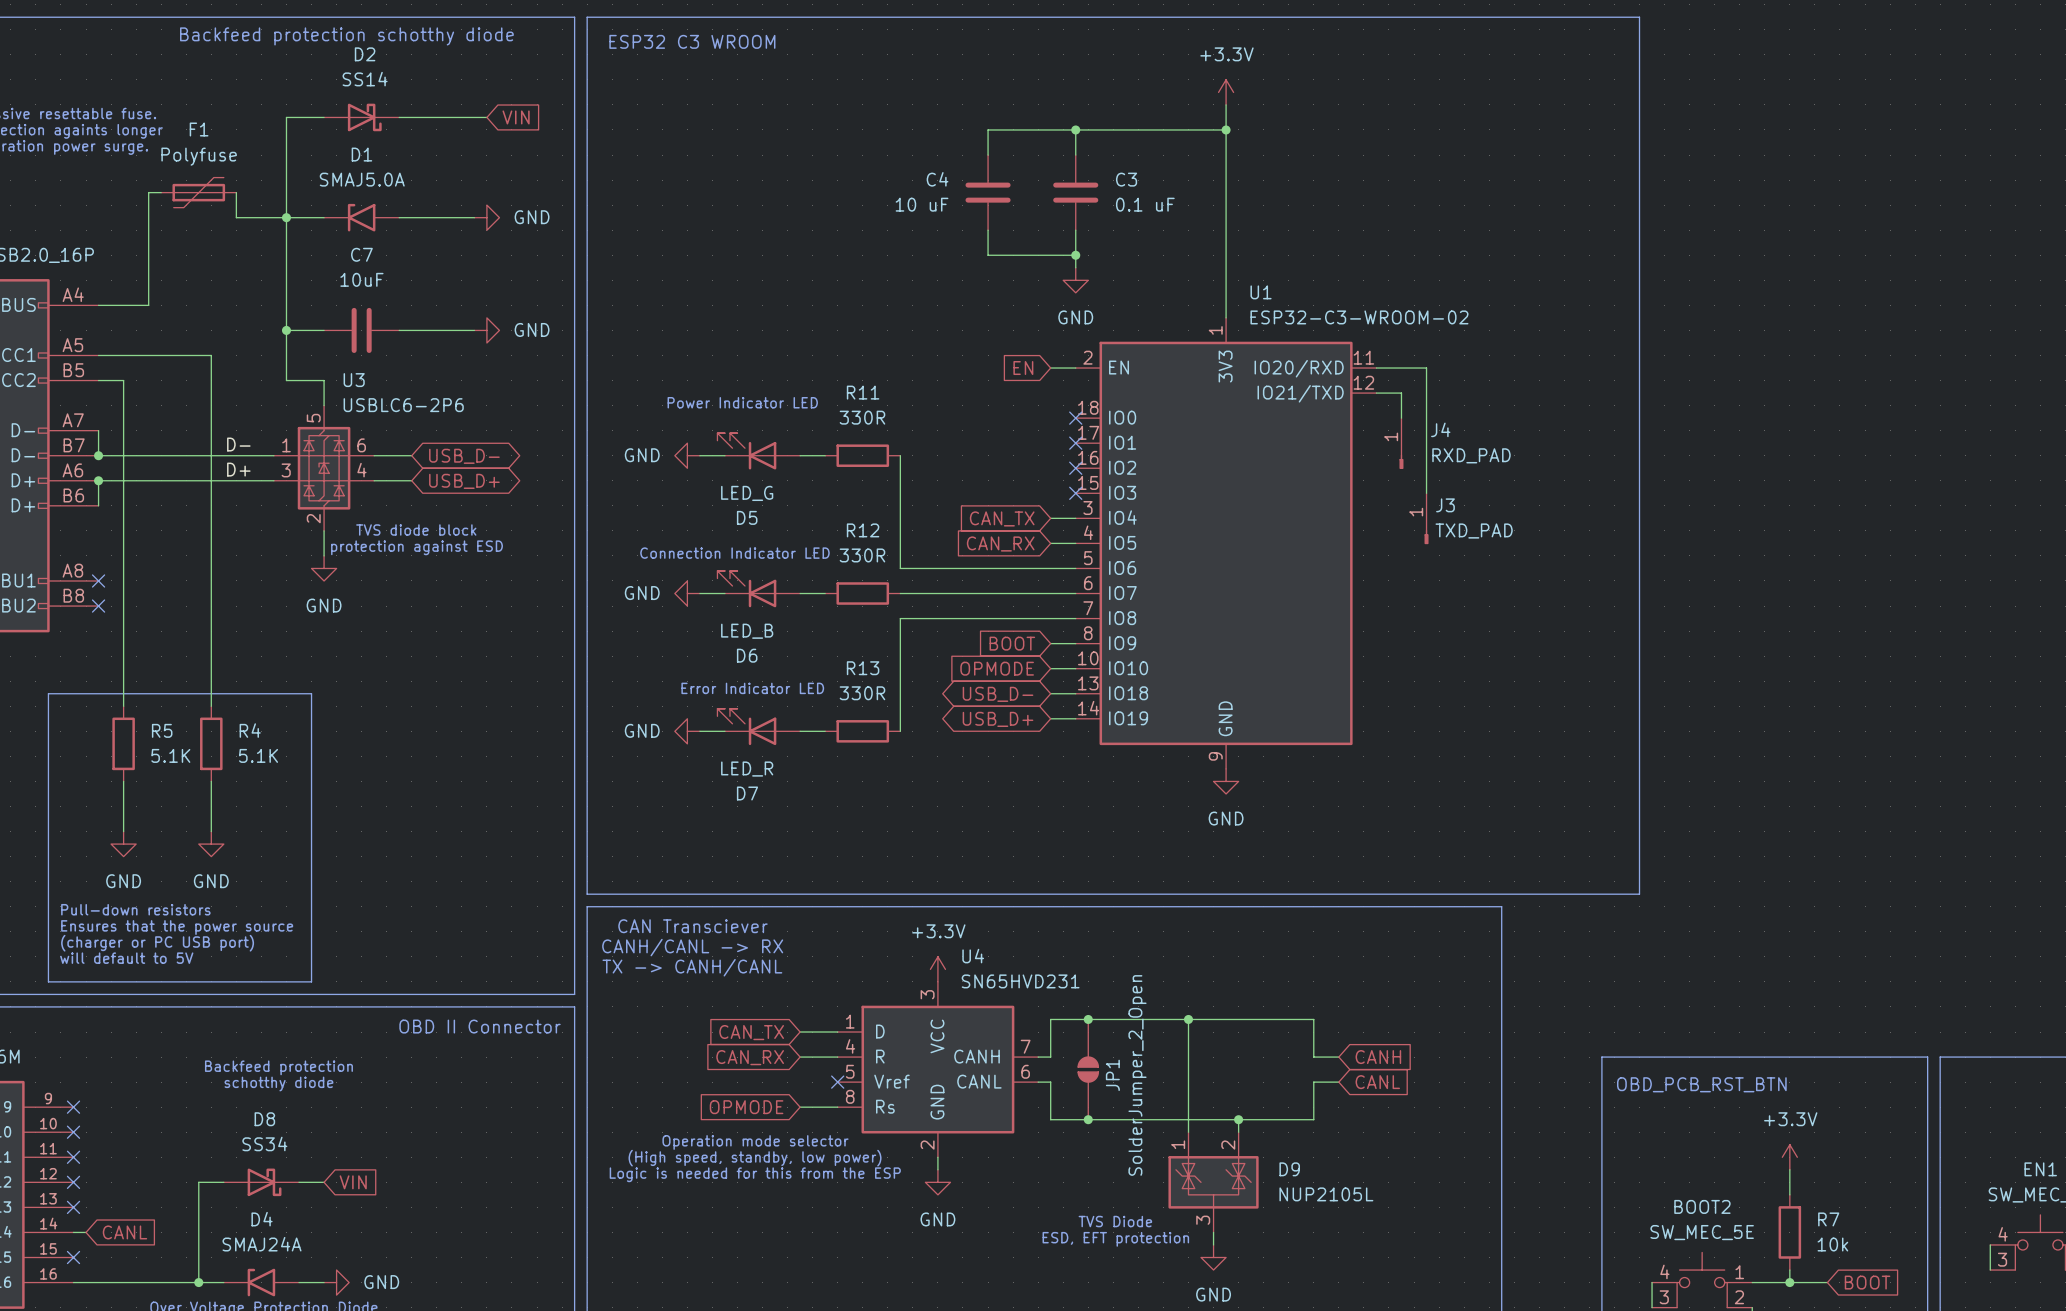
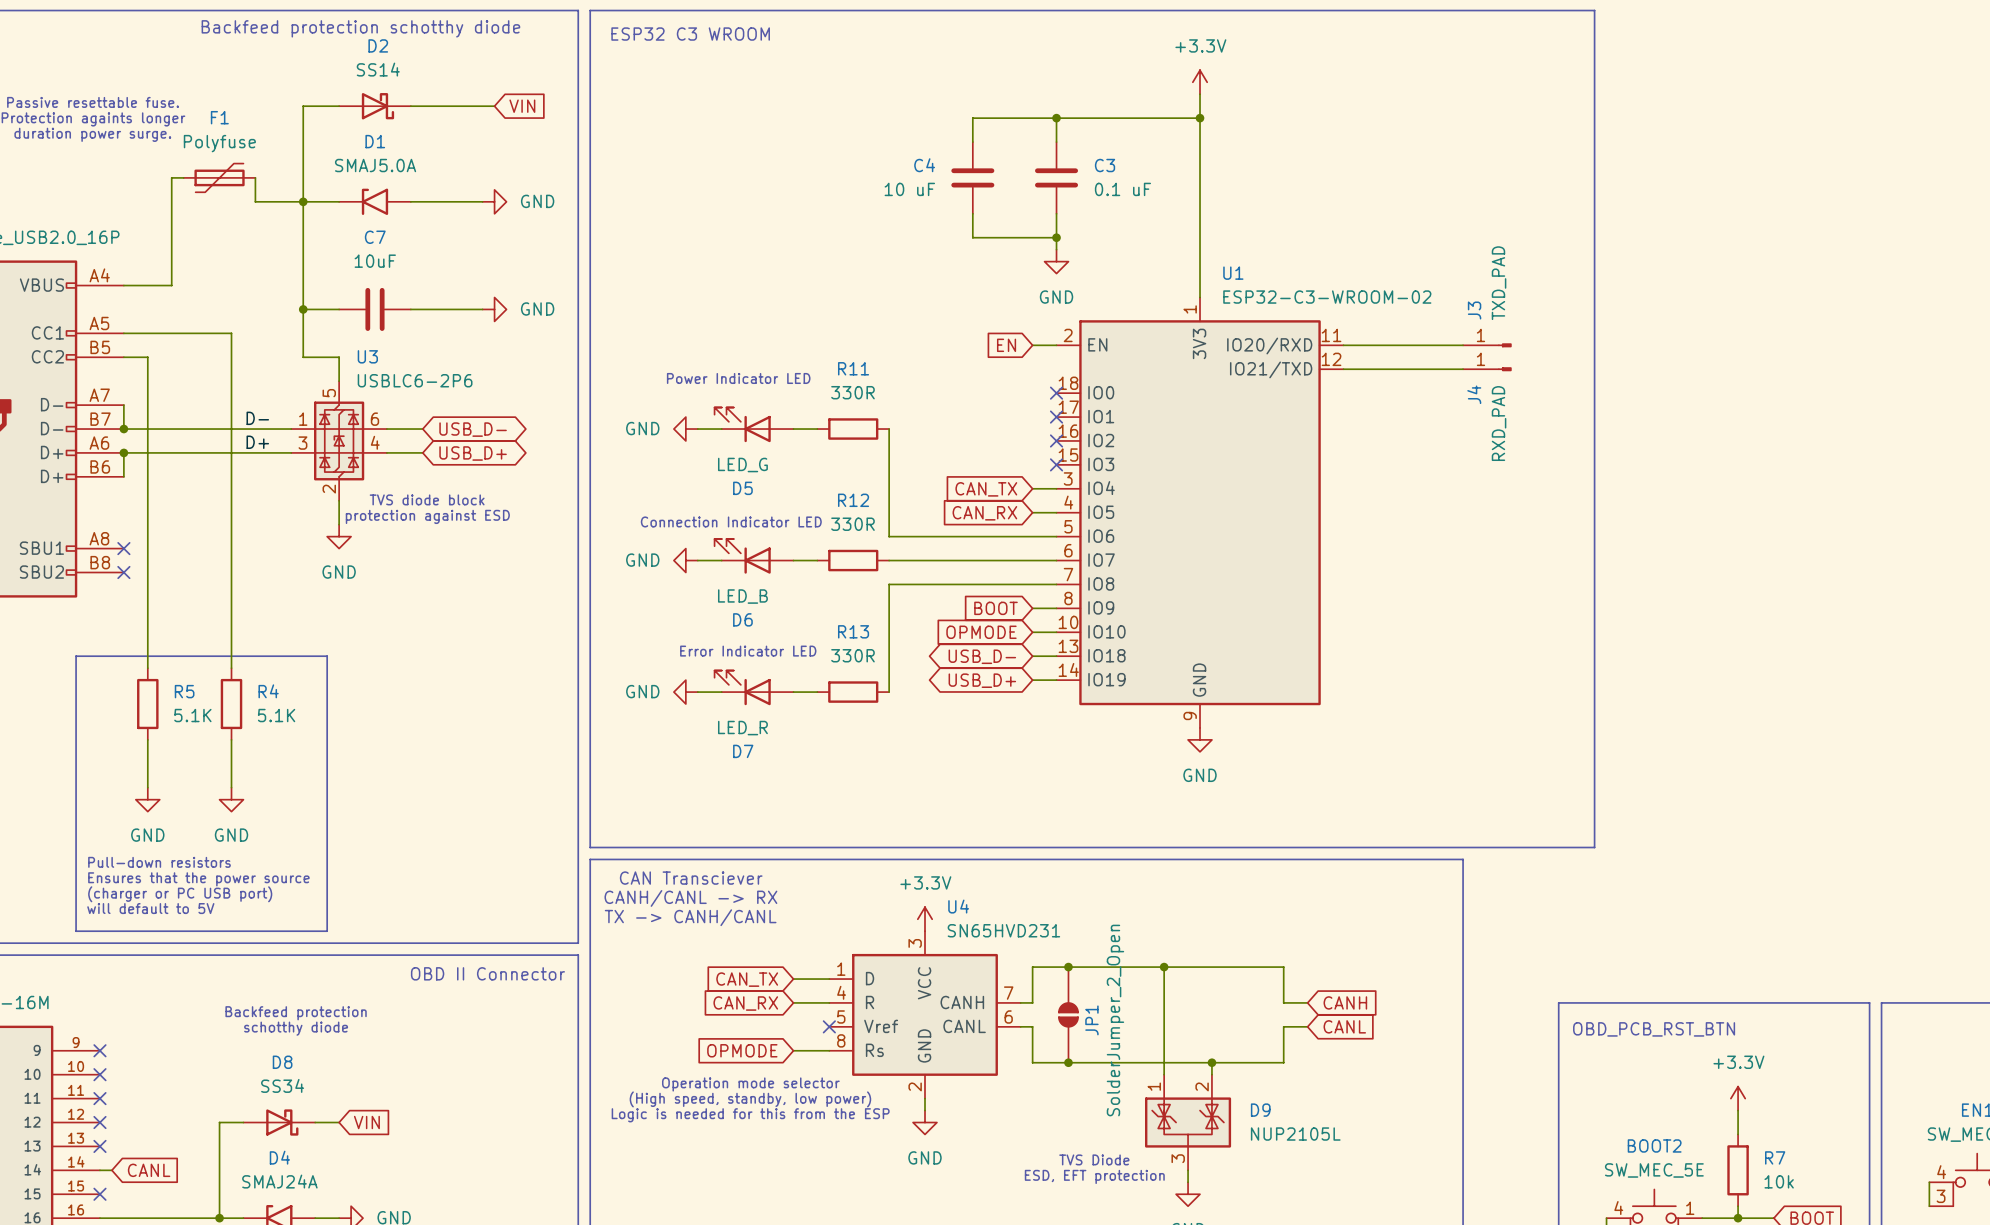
wire: (1426, 368) (1426, 493) -> (1391, 345) (1463, 345)
wire: (1401, 393) (1401, 418) -> (1367, 369) (1463, 369)
J4 name position: J4 (1440, 429) -> J4 (1474, 394)
J4 position: (1401, 443) -> (1487, 369)
J4 value position: RXD_PAD (1471, 455) -> RXD_PAD (1499, 423)
J4 rotation: 0° (1401, 461) -> 90° counterclockwise (1504, 369)
J3 position: (1426, 518) -> (1487, 345)
J3 rotation: 0° (1426, 537) -> 90° counterclockwise (1504, 345)

